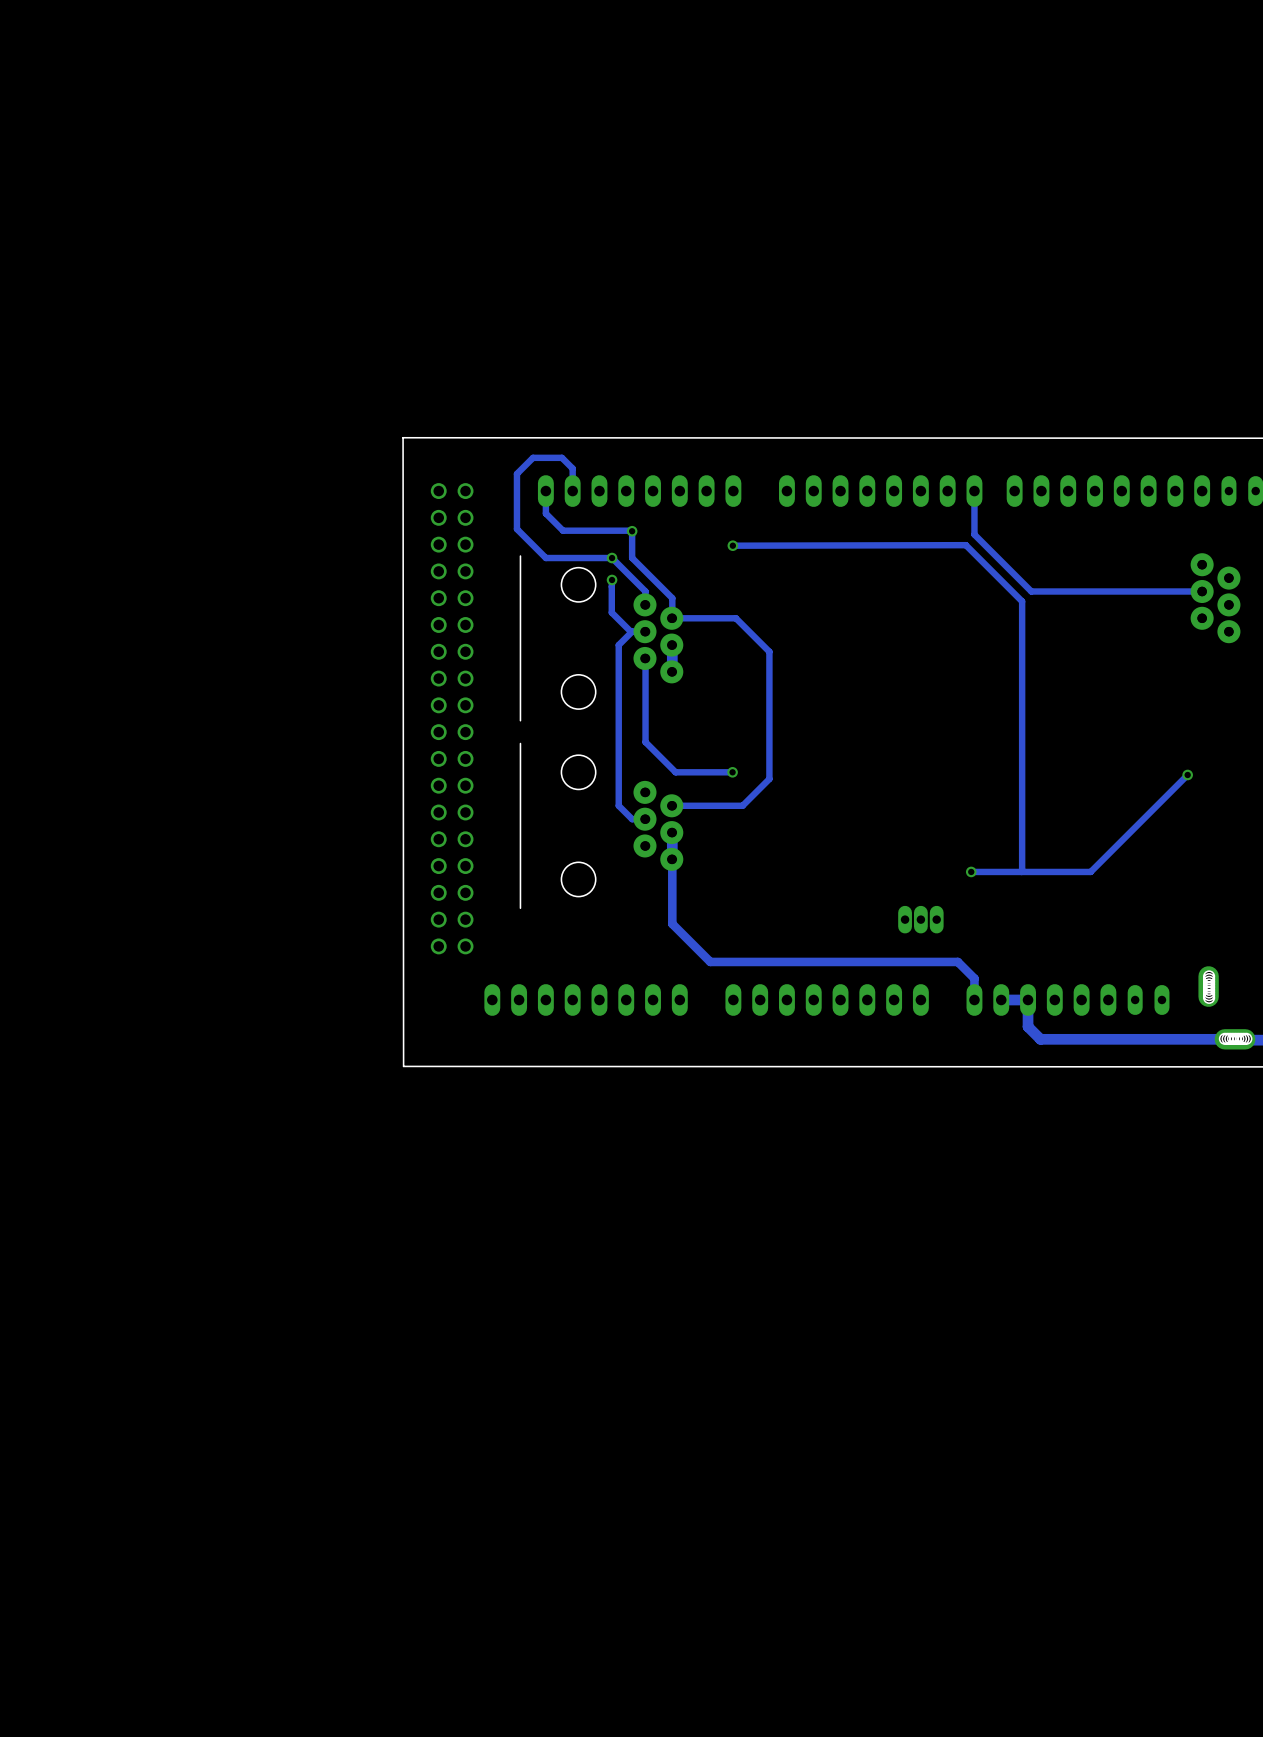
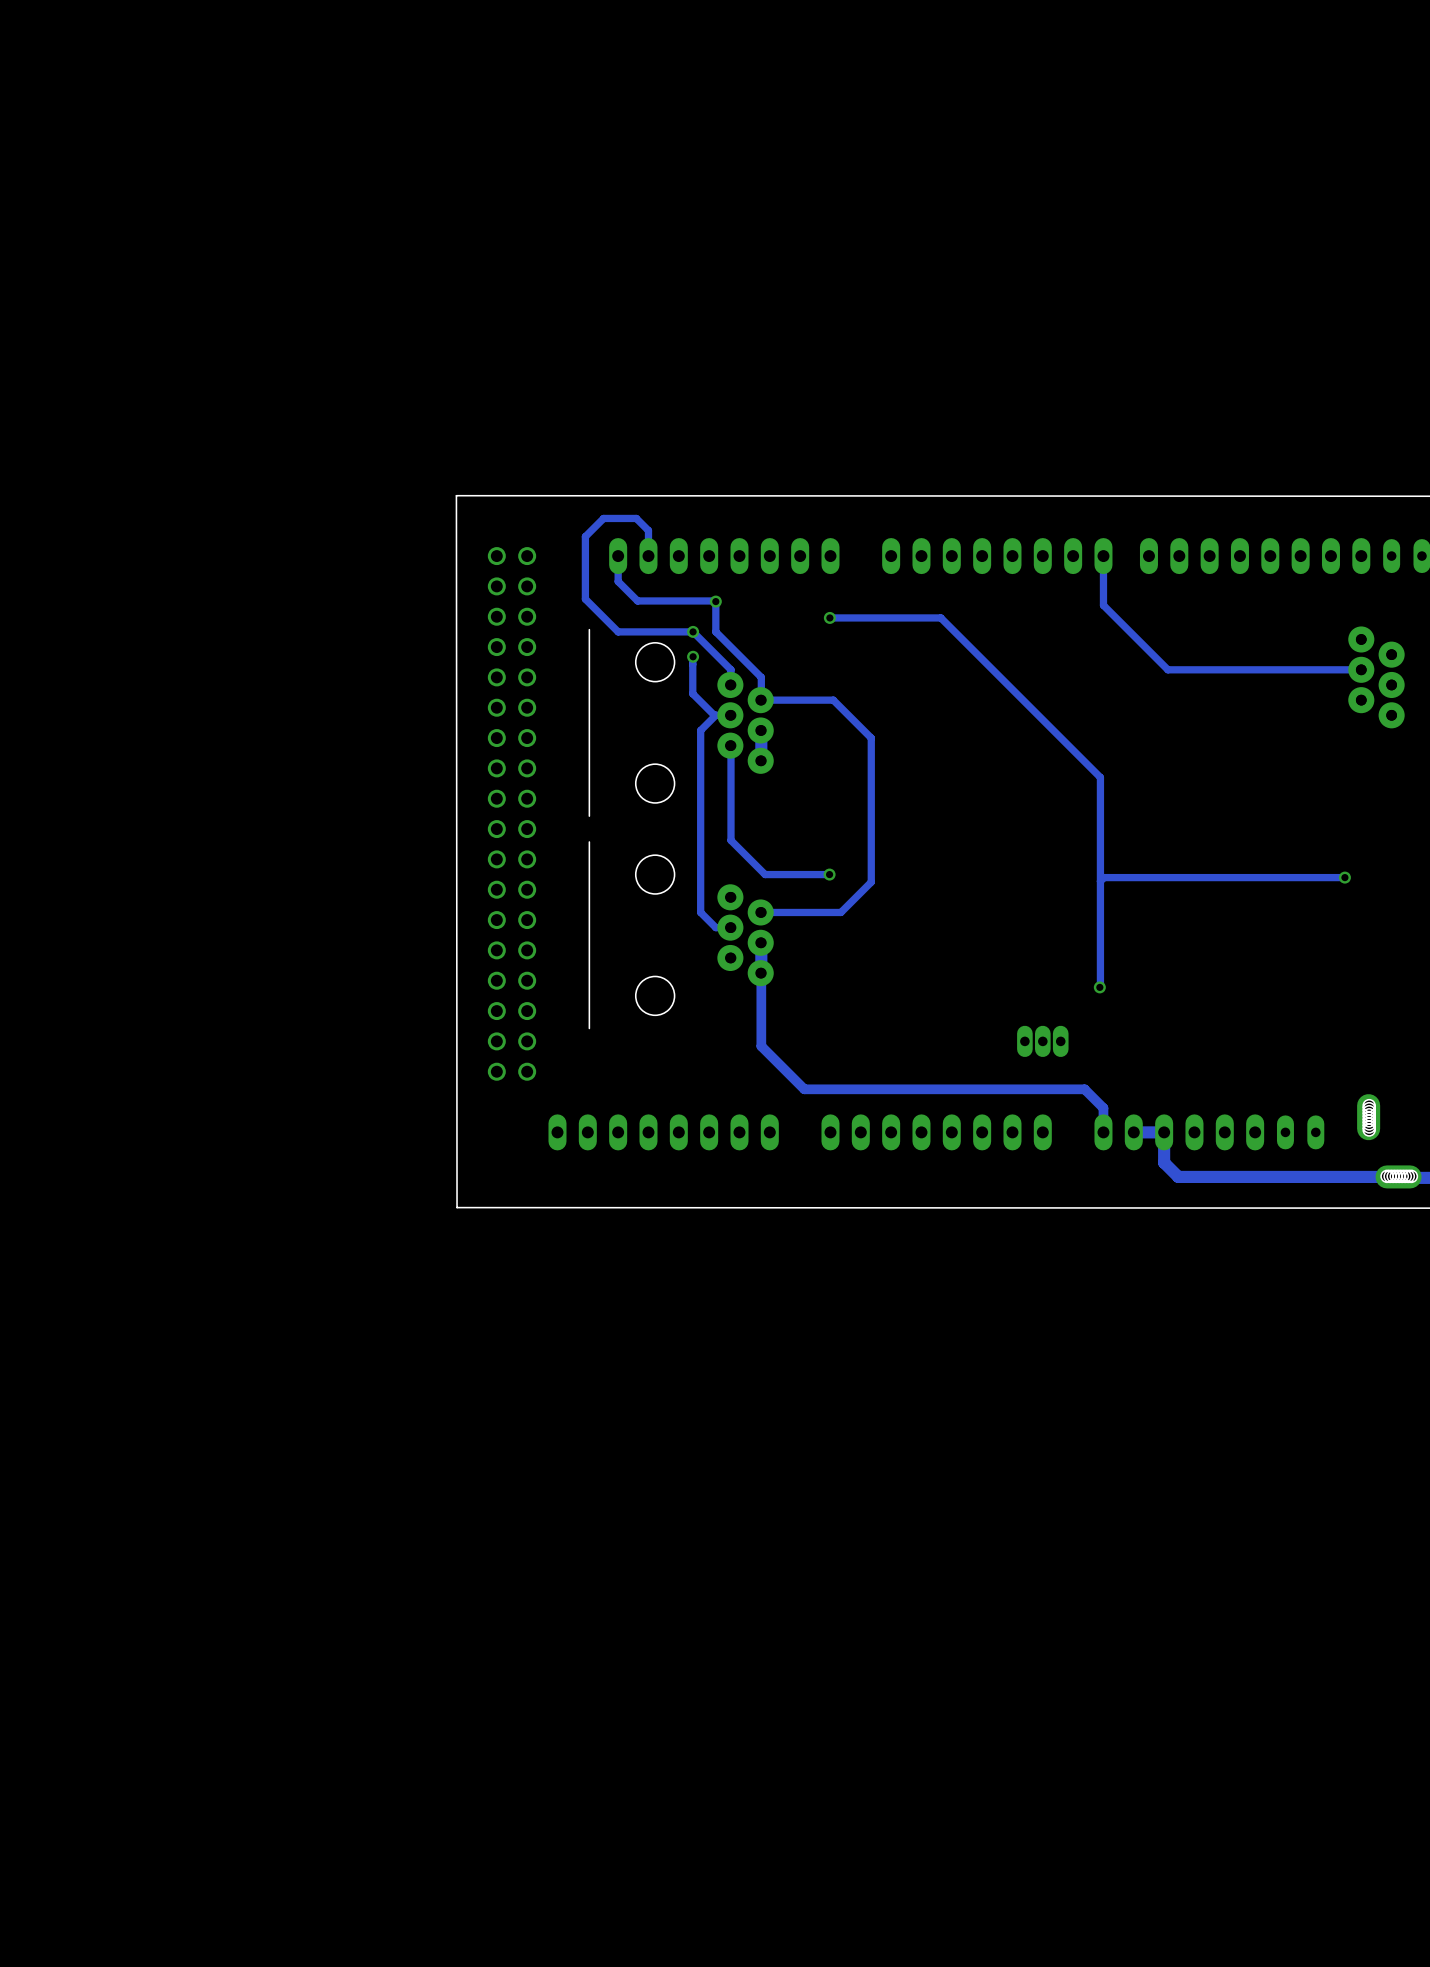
track: (732, 545) (965, 545) (1022, 601) (1021, 871) -> (829, 617) (940, 617) (1100, 777) (1099, 987)
track: (1187, 774) (1090, 871) (971, 871) -> (1344, 877) (1104, 877) (1100, 881)

